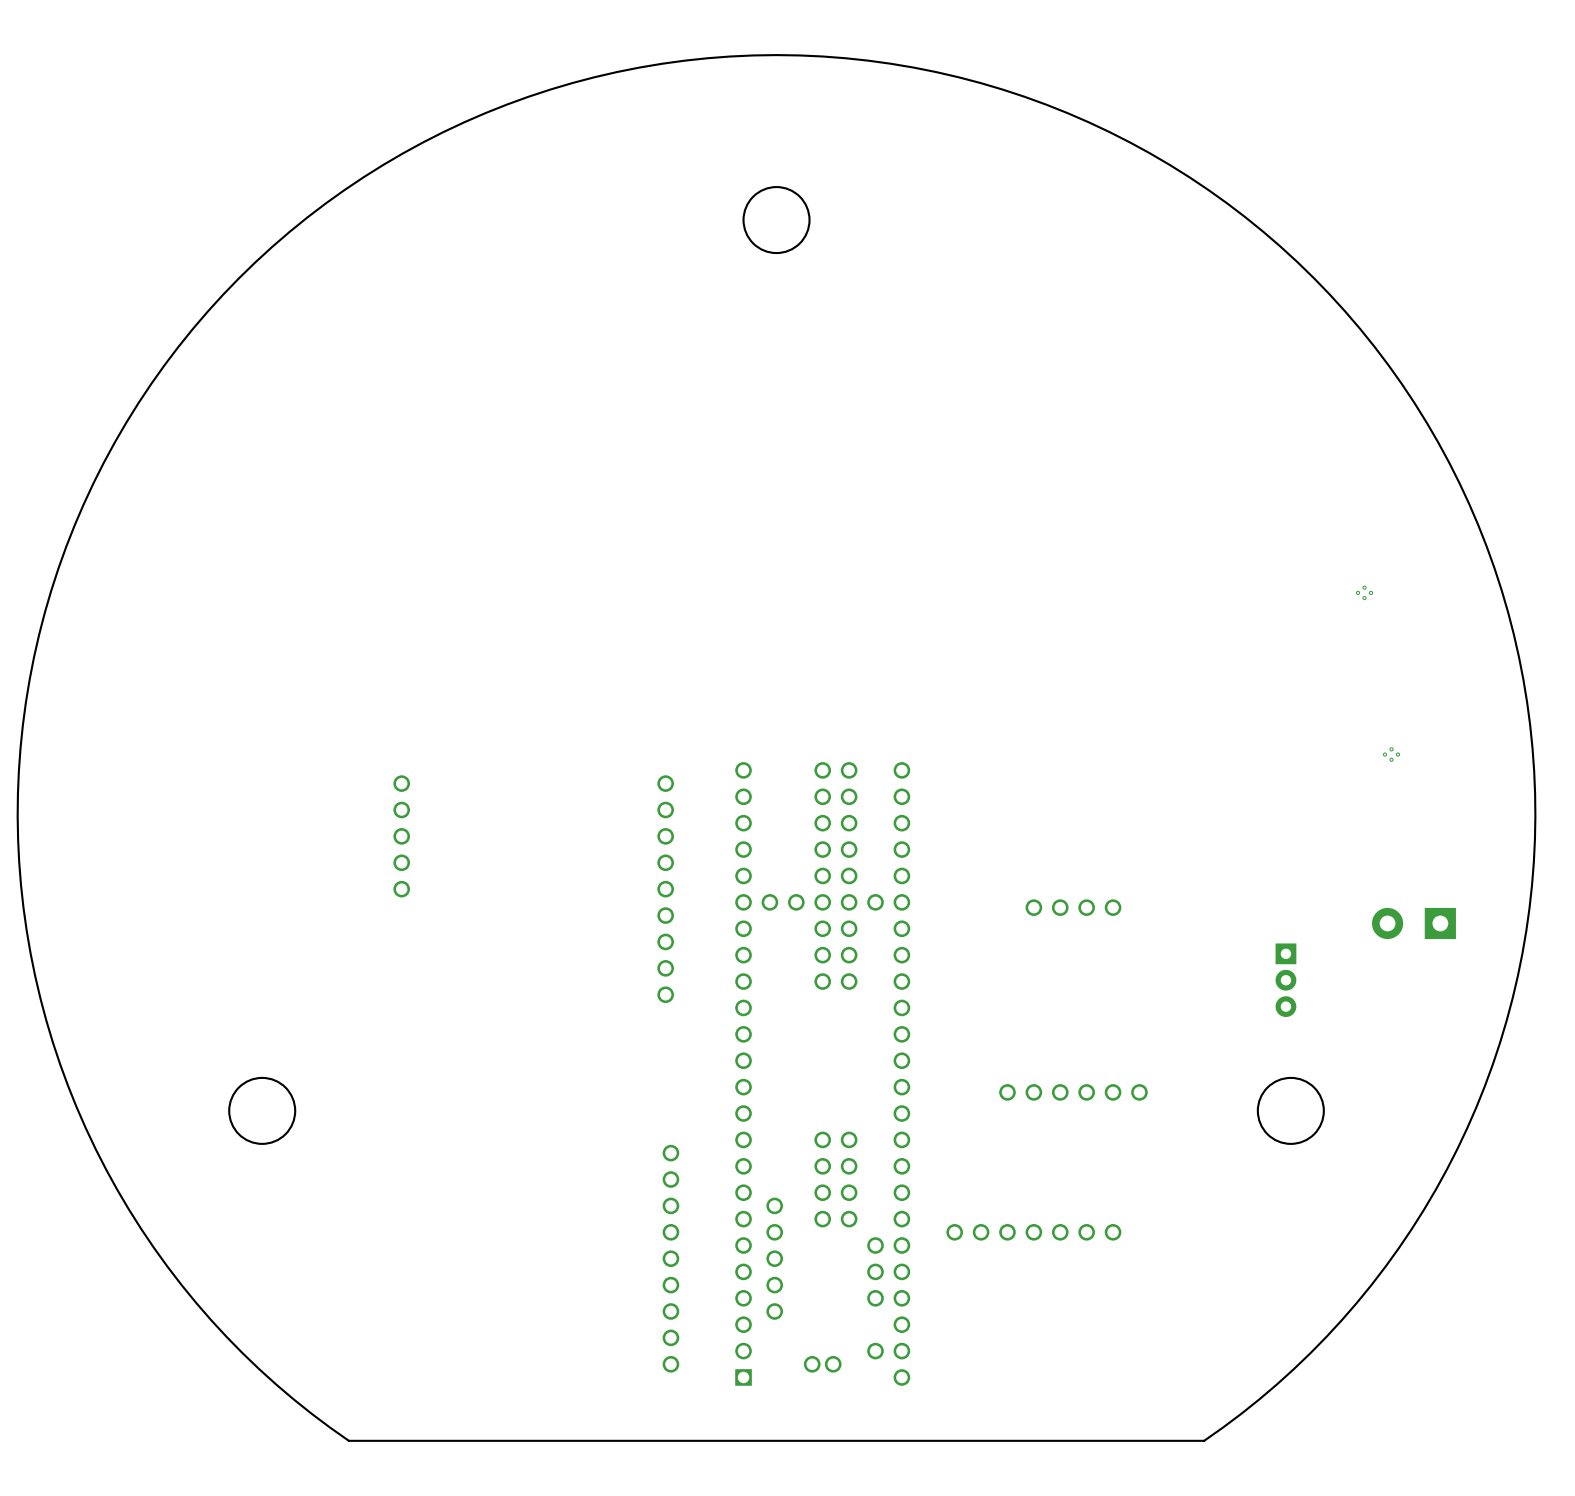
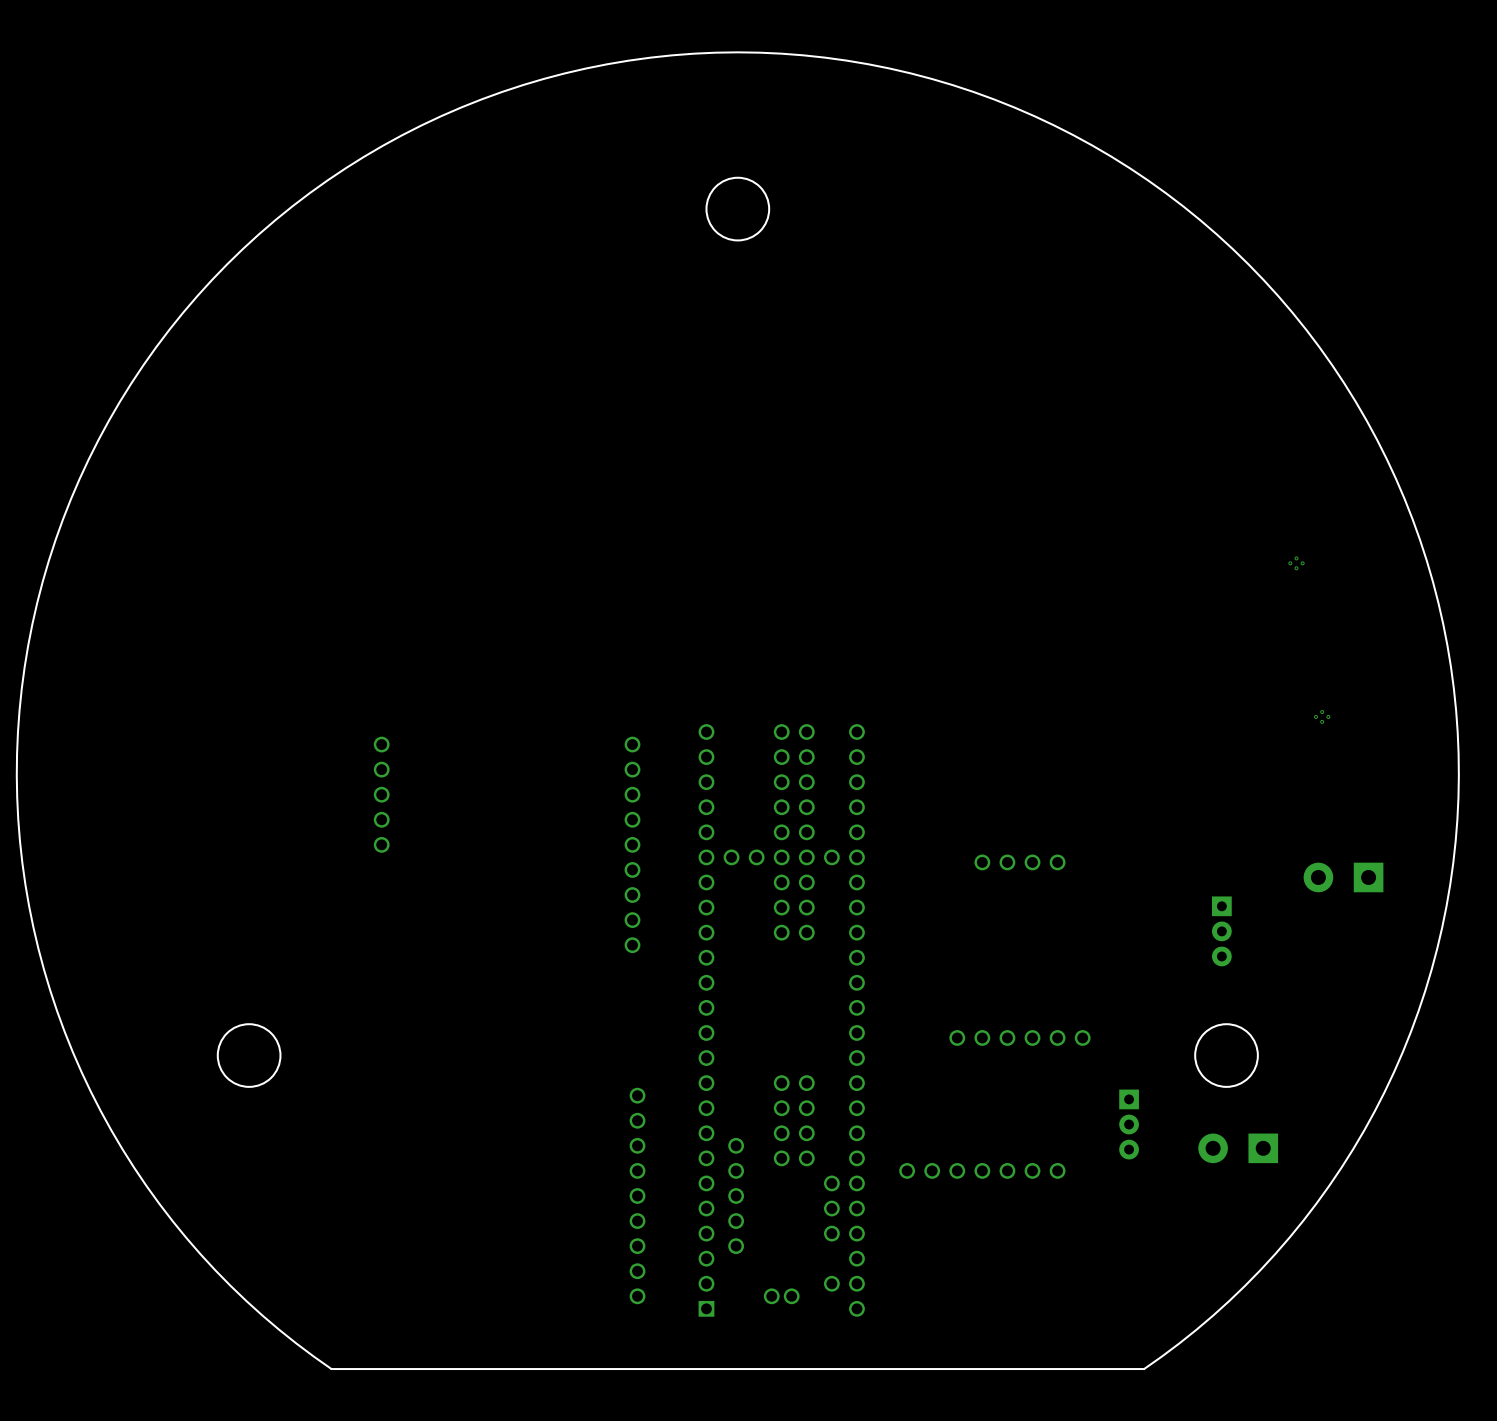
part: none -> (1129, 1124)
part: none -> (1238, 1148)

